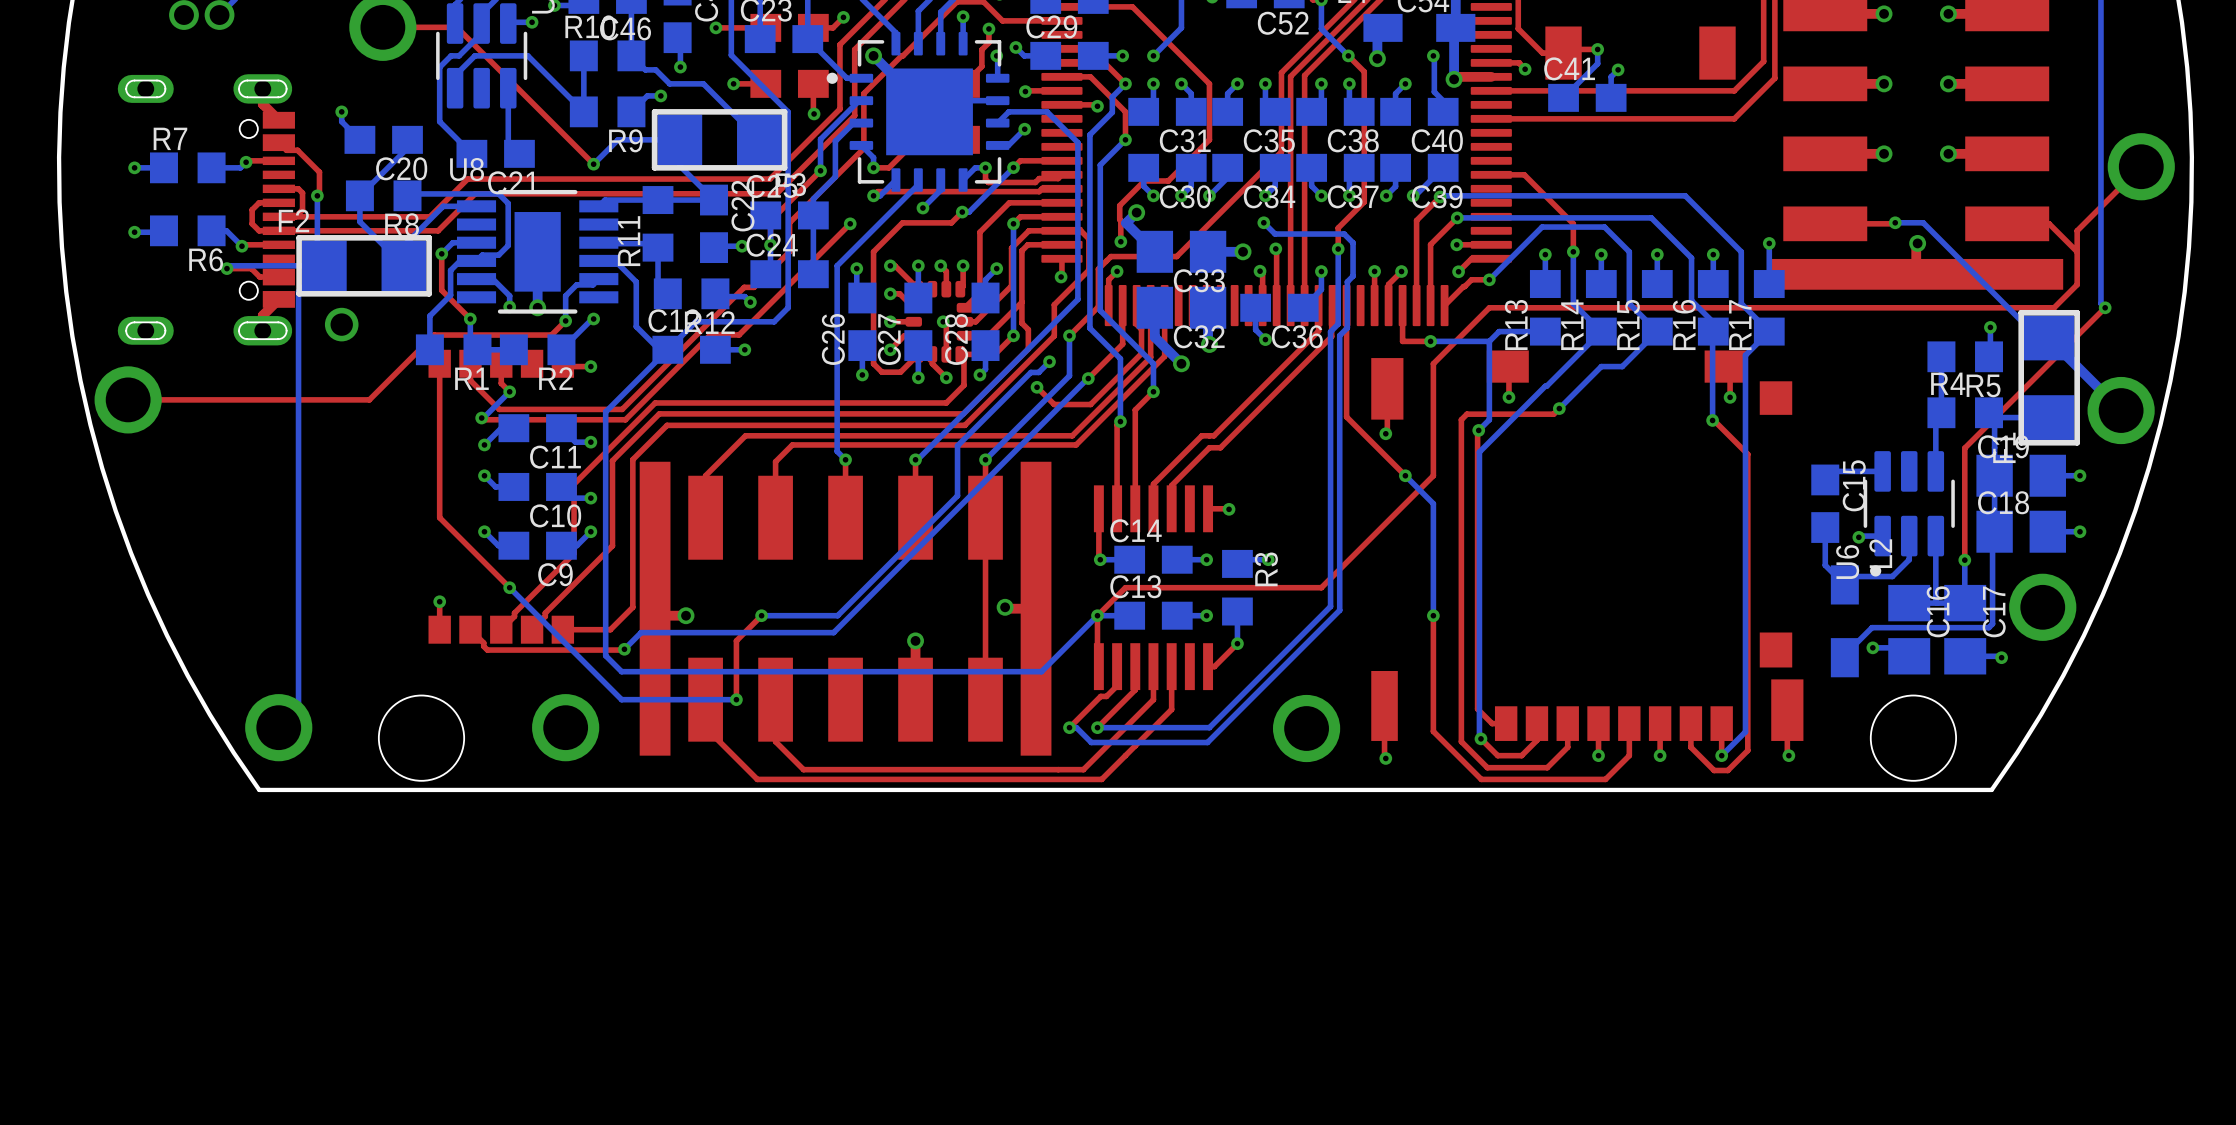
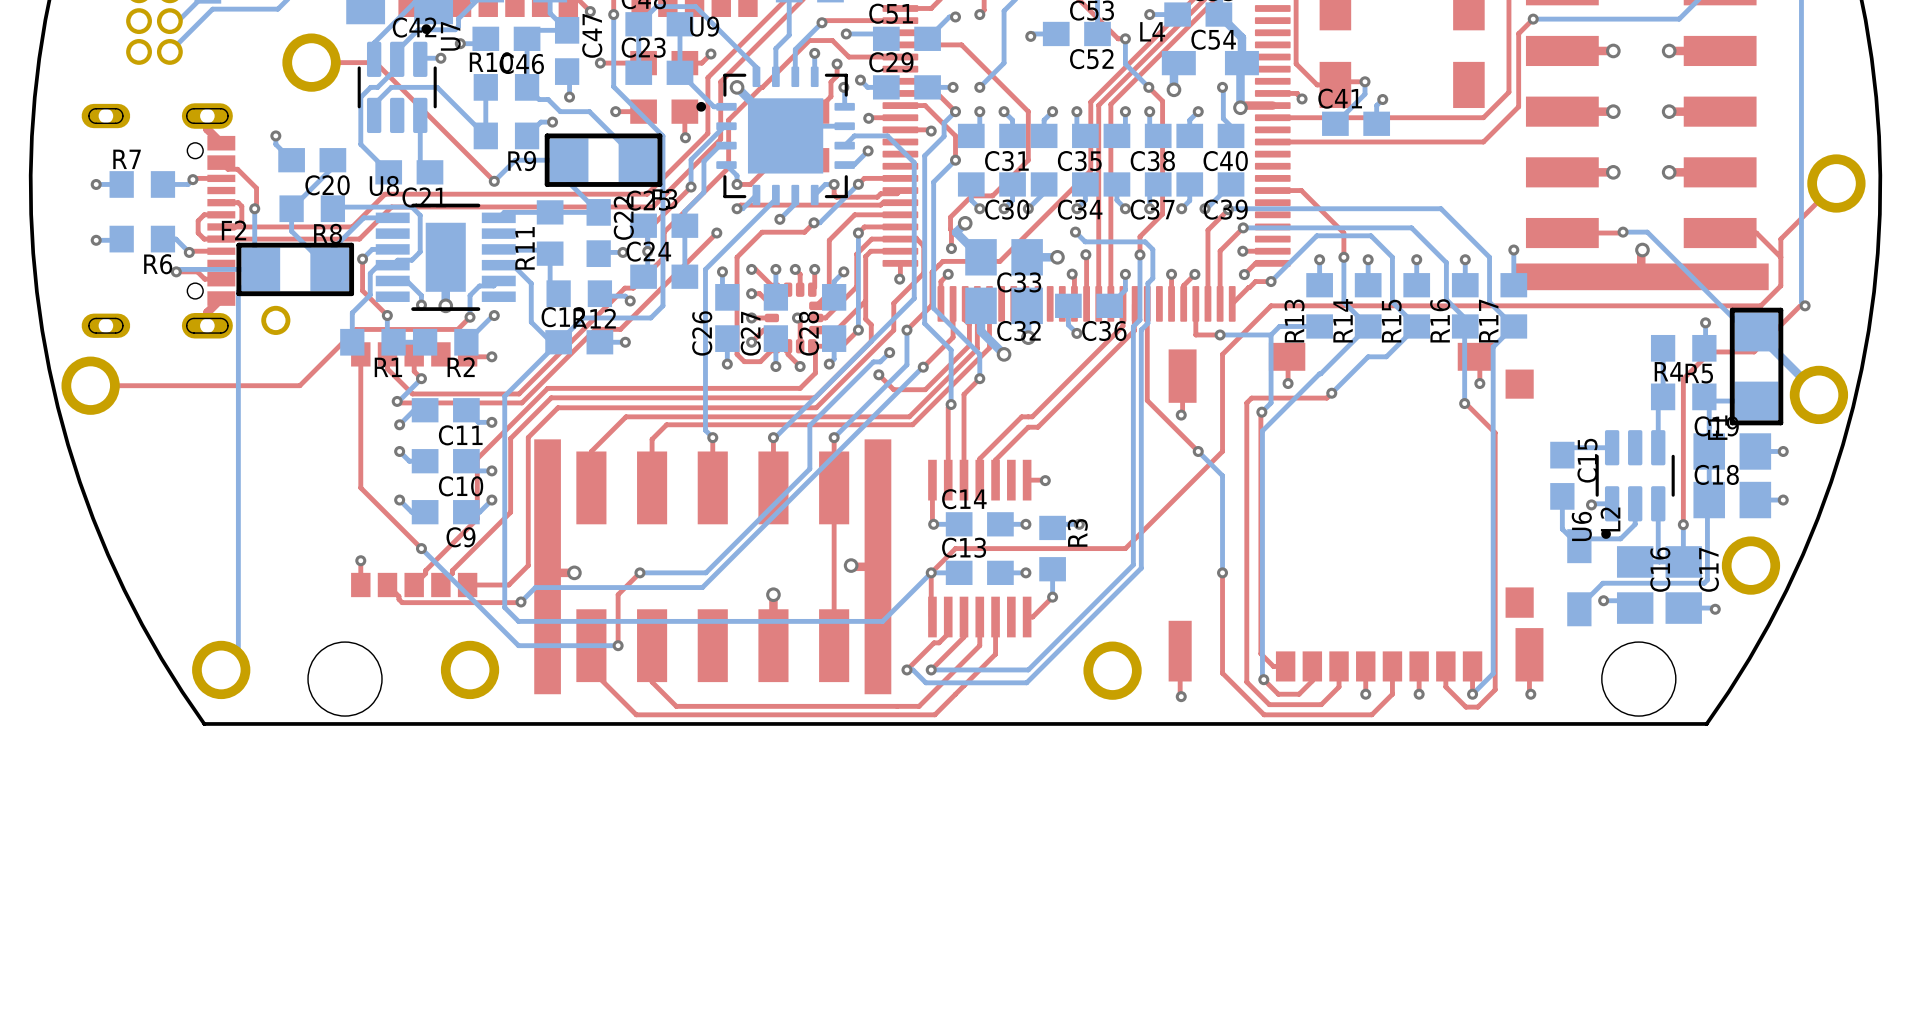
top track: (2105, 307) (1964, 448) -> (1800, 305) (1754, 351) (1710, 351) (1683, 379) (1683, 427)

